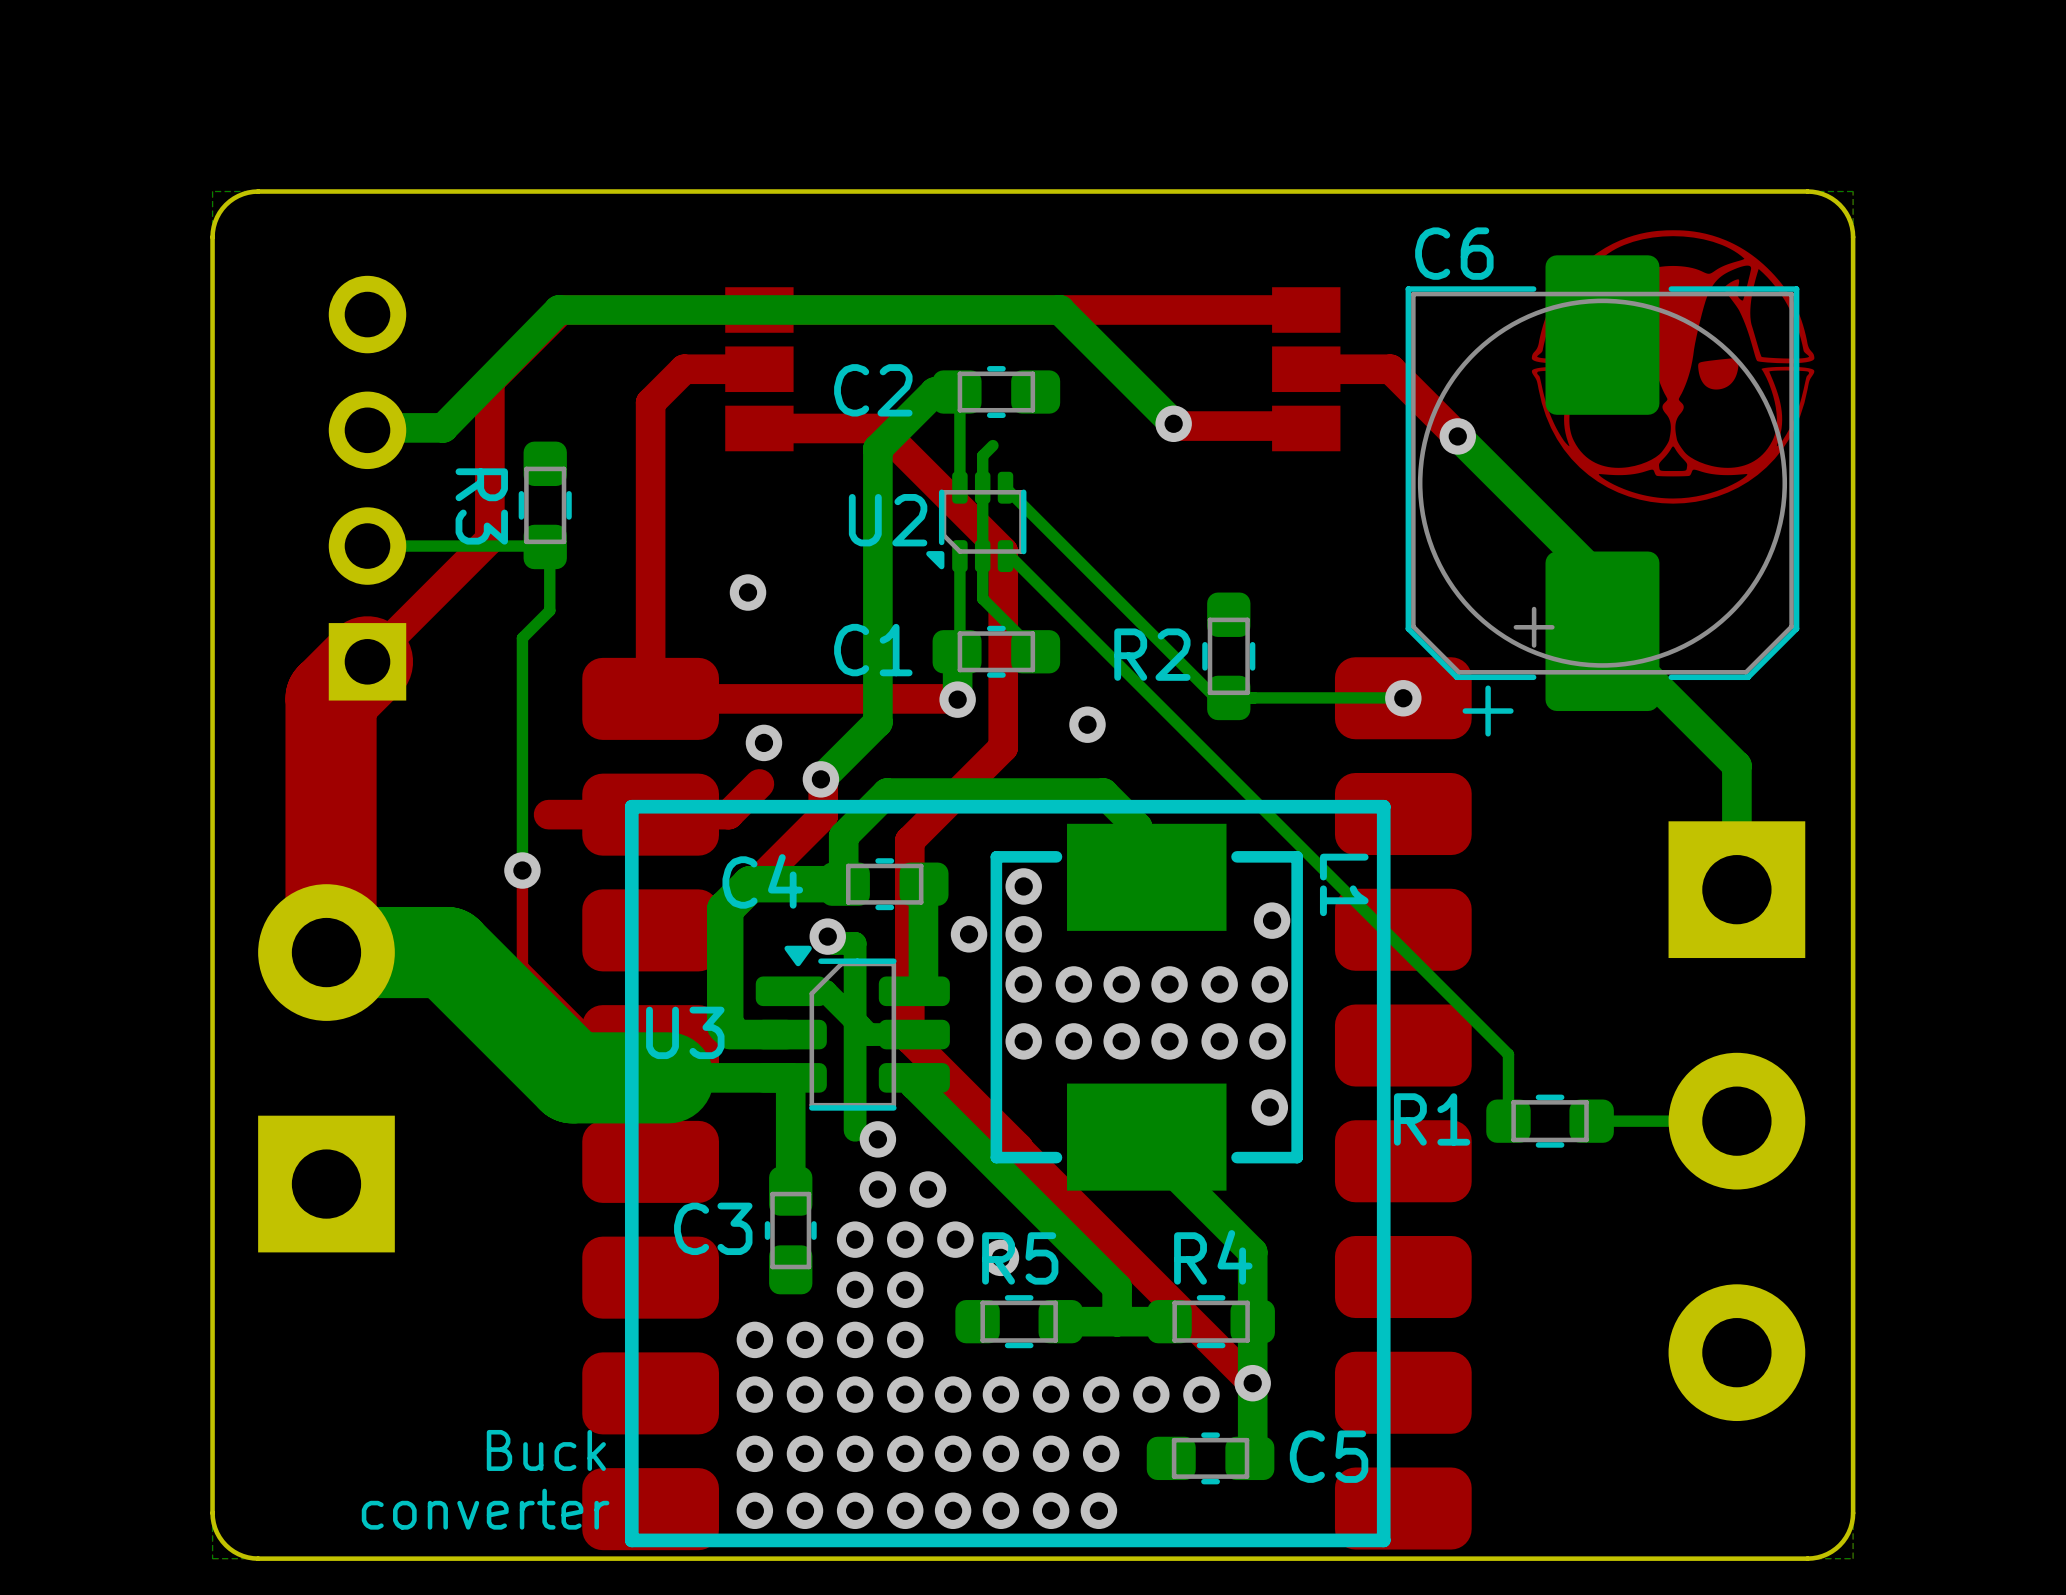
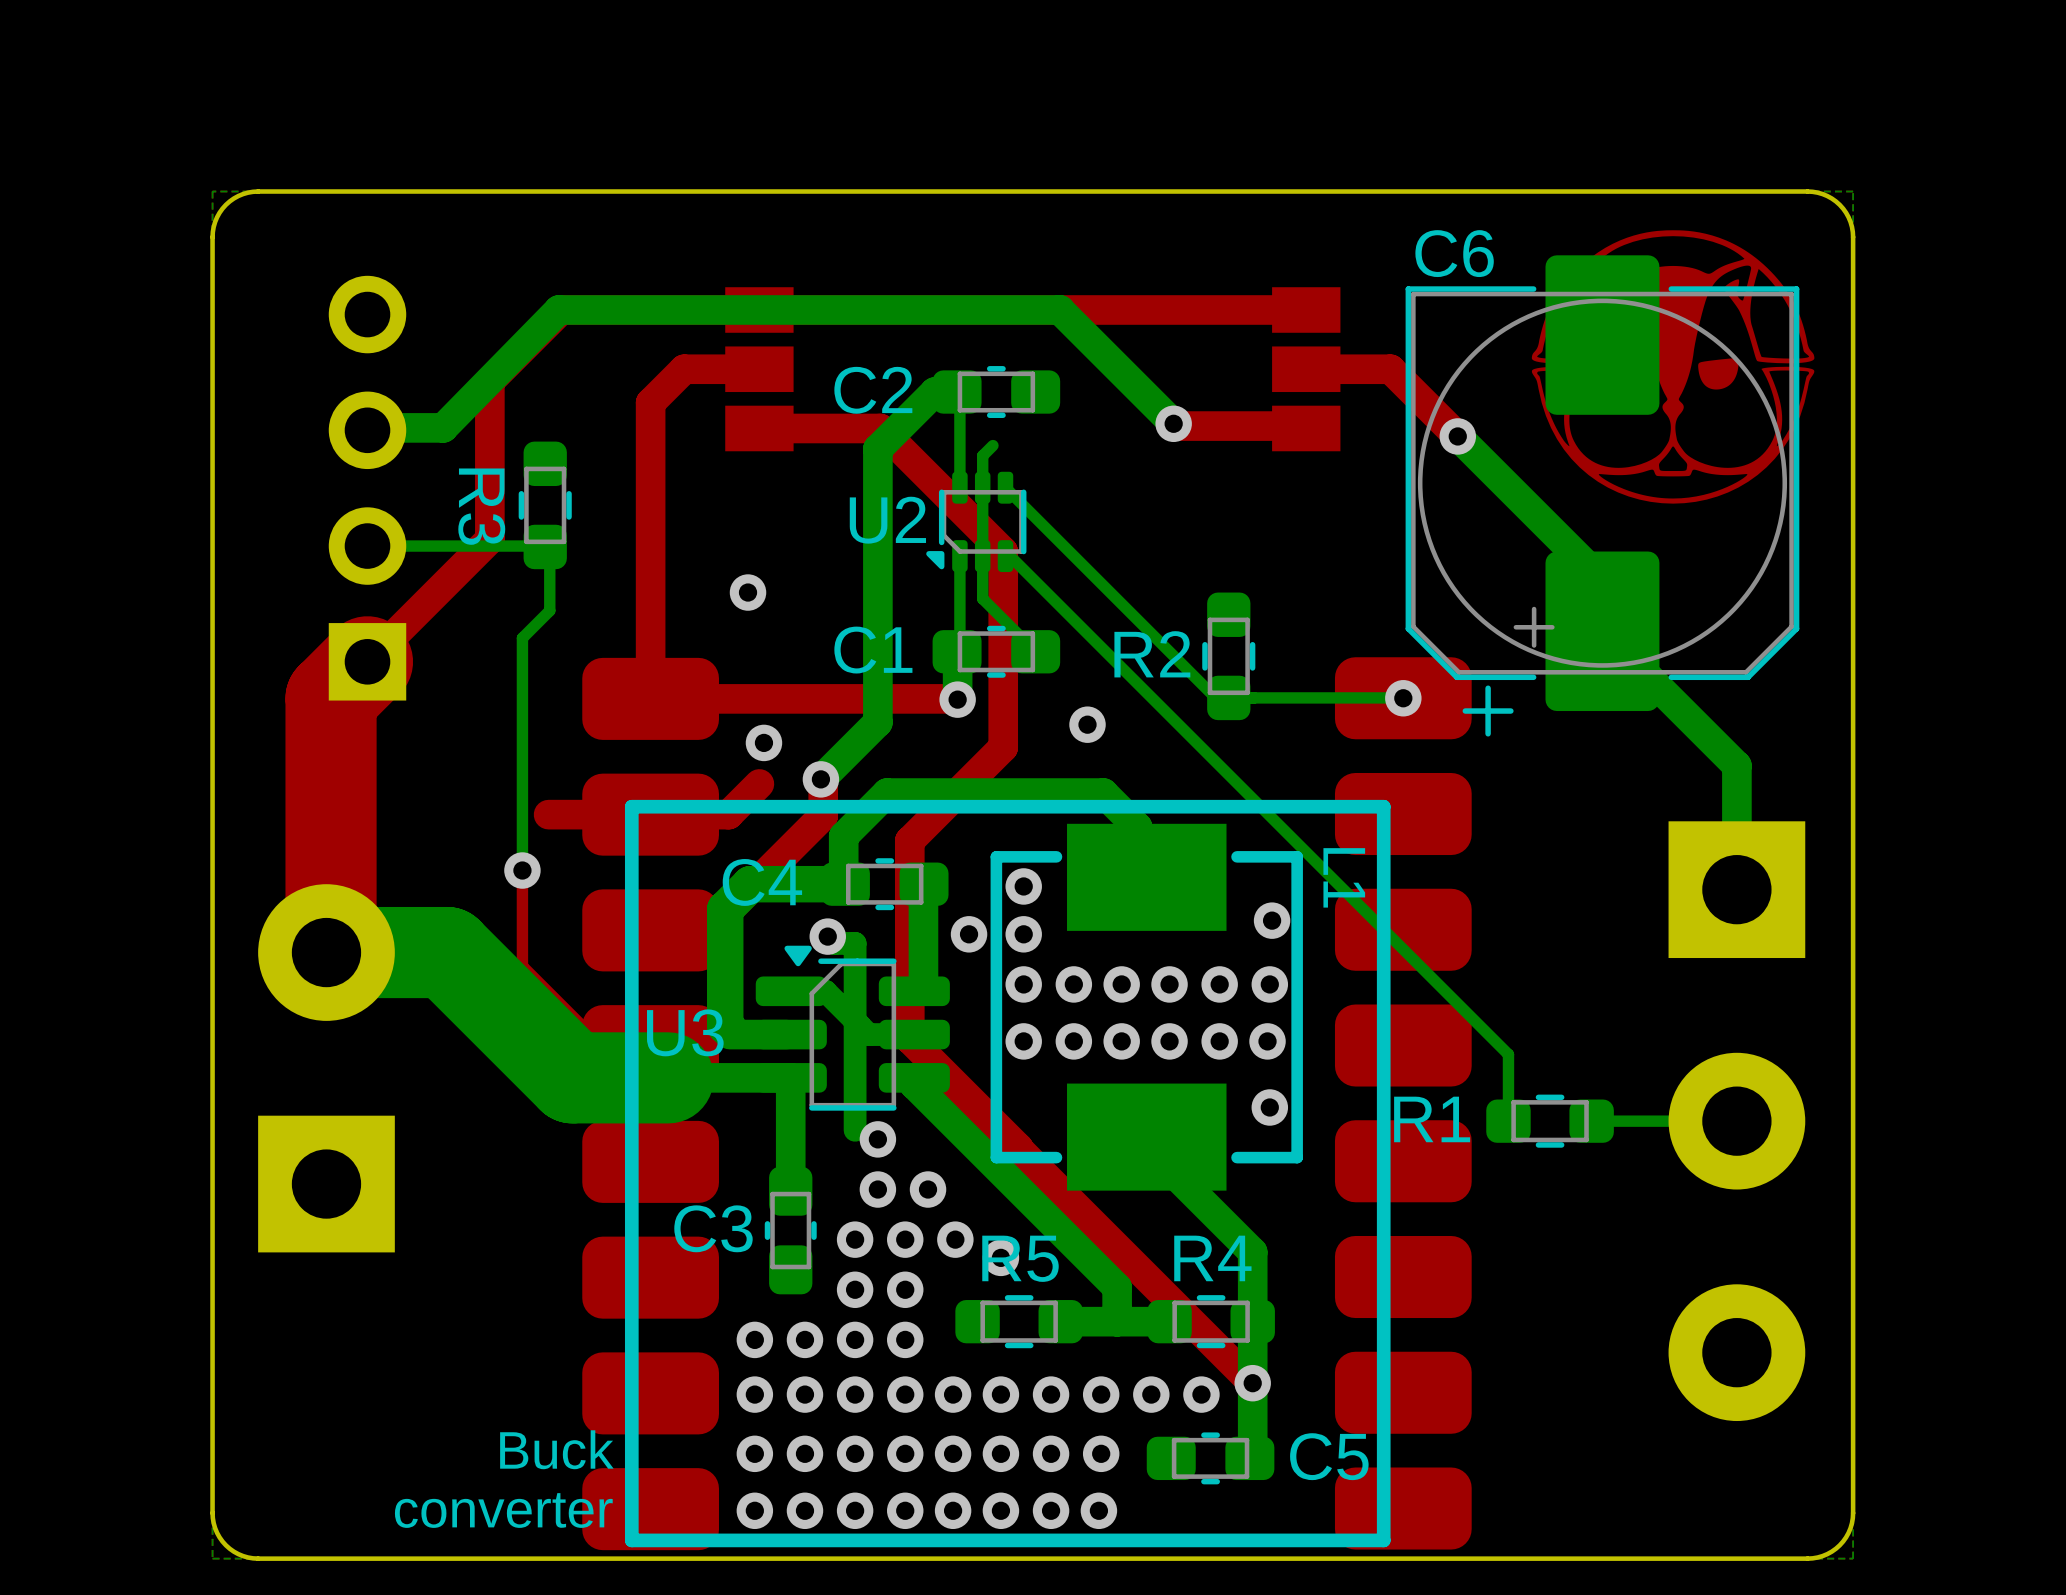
L1 name position: L1 (1344, 884) -> L1 (1344, 877)

